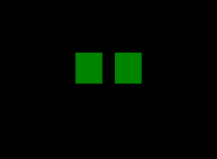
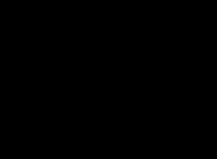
part: (108, 68) -> none

